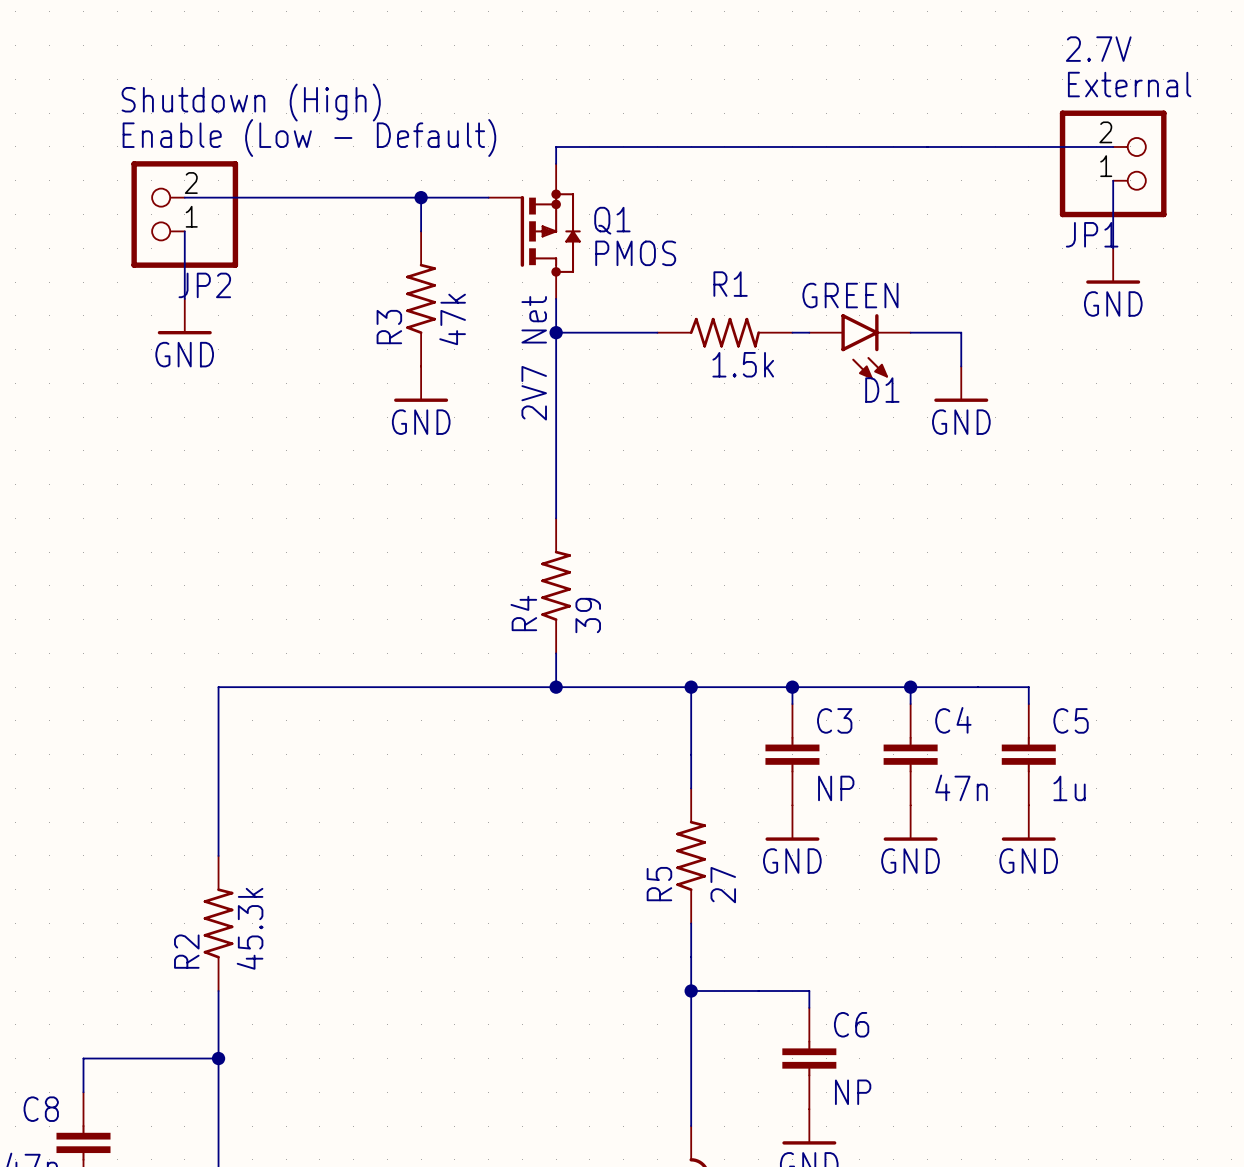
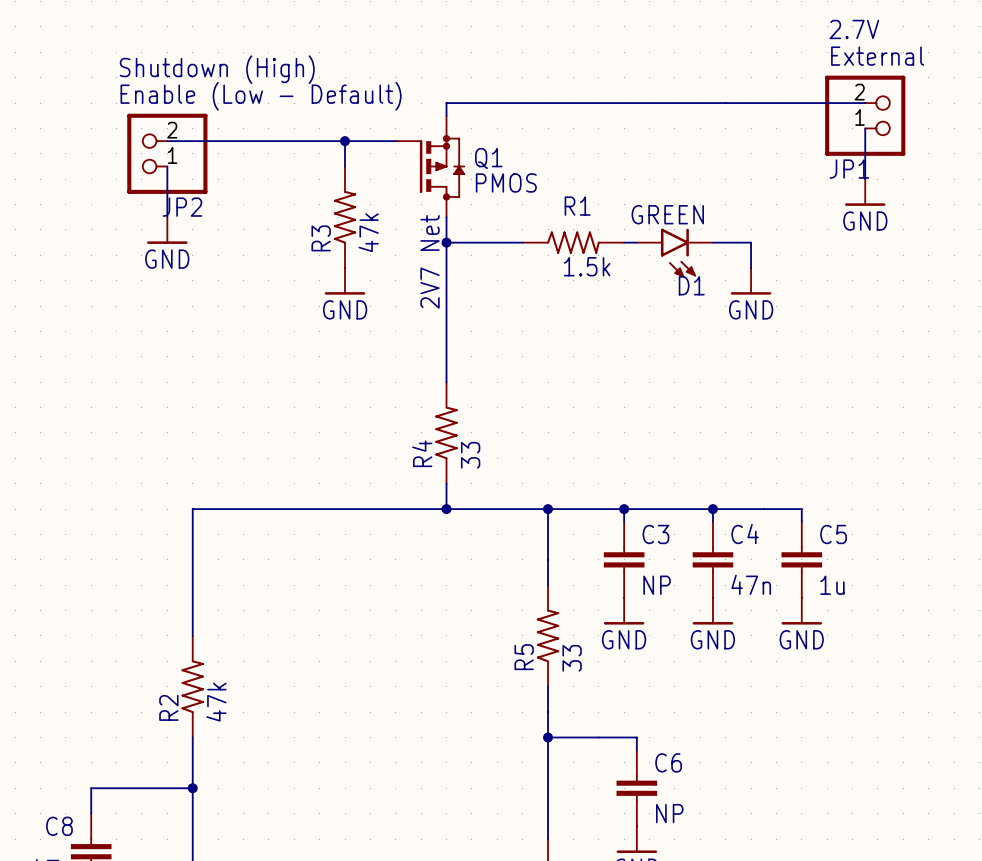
R4 value: 39 (588, 615) -> 33 (470, 455)
R5 value: 27 (723, 885) -> 33 (572, 658)
R2 value: 45.3k (250, 928) -> 47k (216, 702)

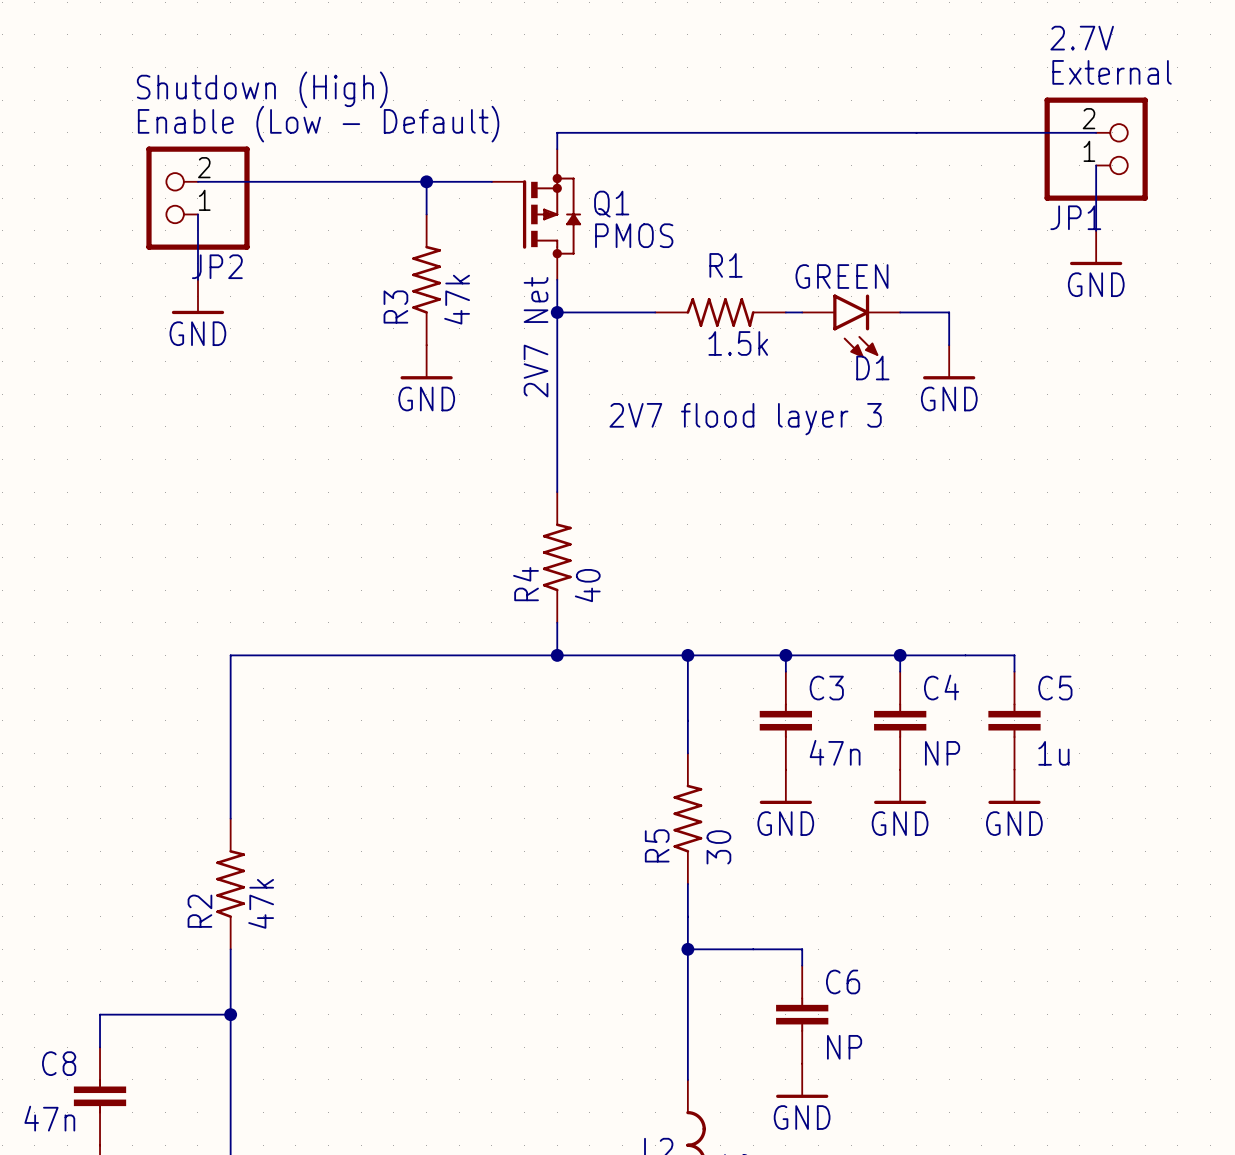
text: none -> 2V7 flood layer 3 (745, 419)
R4 value: 33 (470, 455) -> 40 (587, 585)
C4 value: 47n (751, 584) -> NP (942, 753)
C3 value: NP (657, 585) -> 47n (835, 752)
R5 value: 33 (572, 658) -> 30 (718, 847)

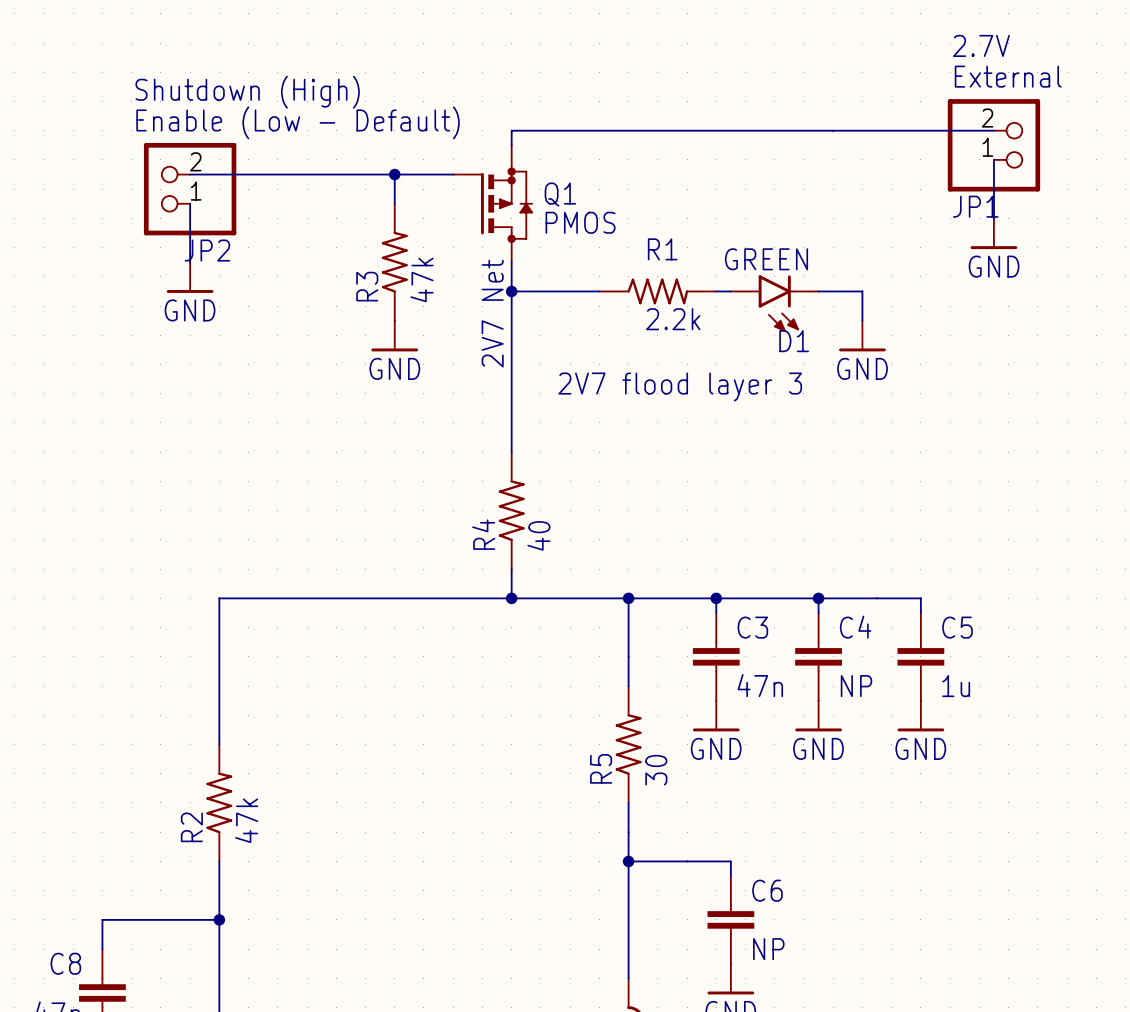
R1 value: 1.5k (738, 343) -> 2.2k (673, 319)

